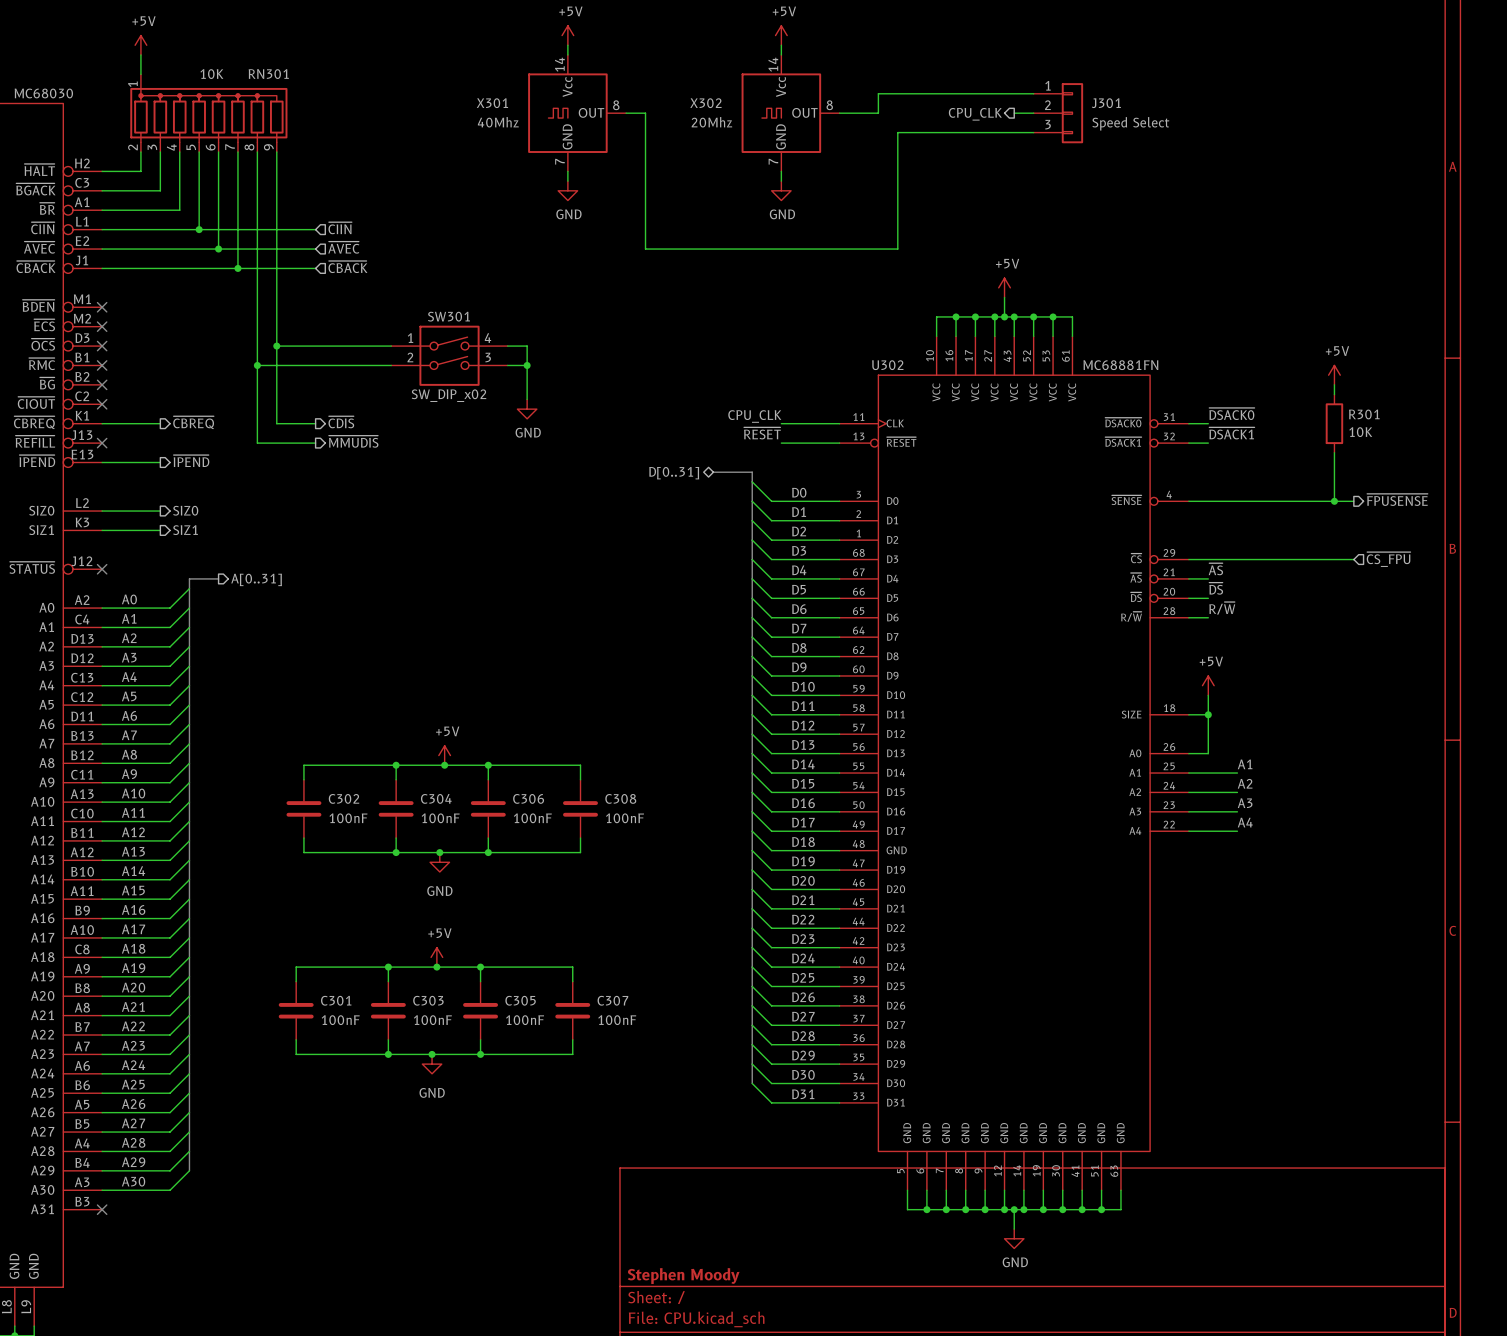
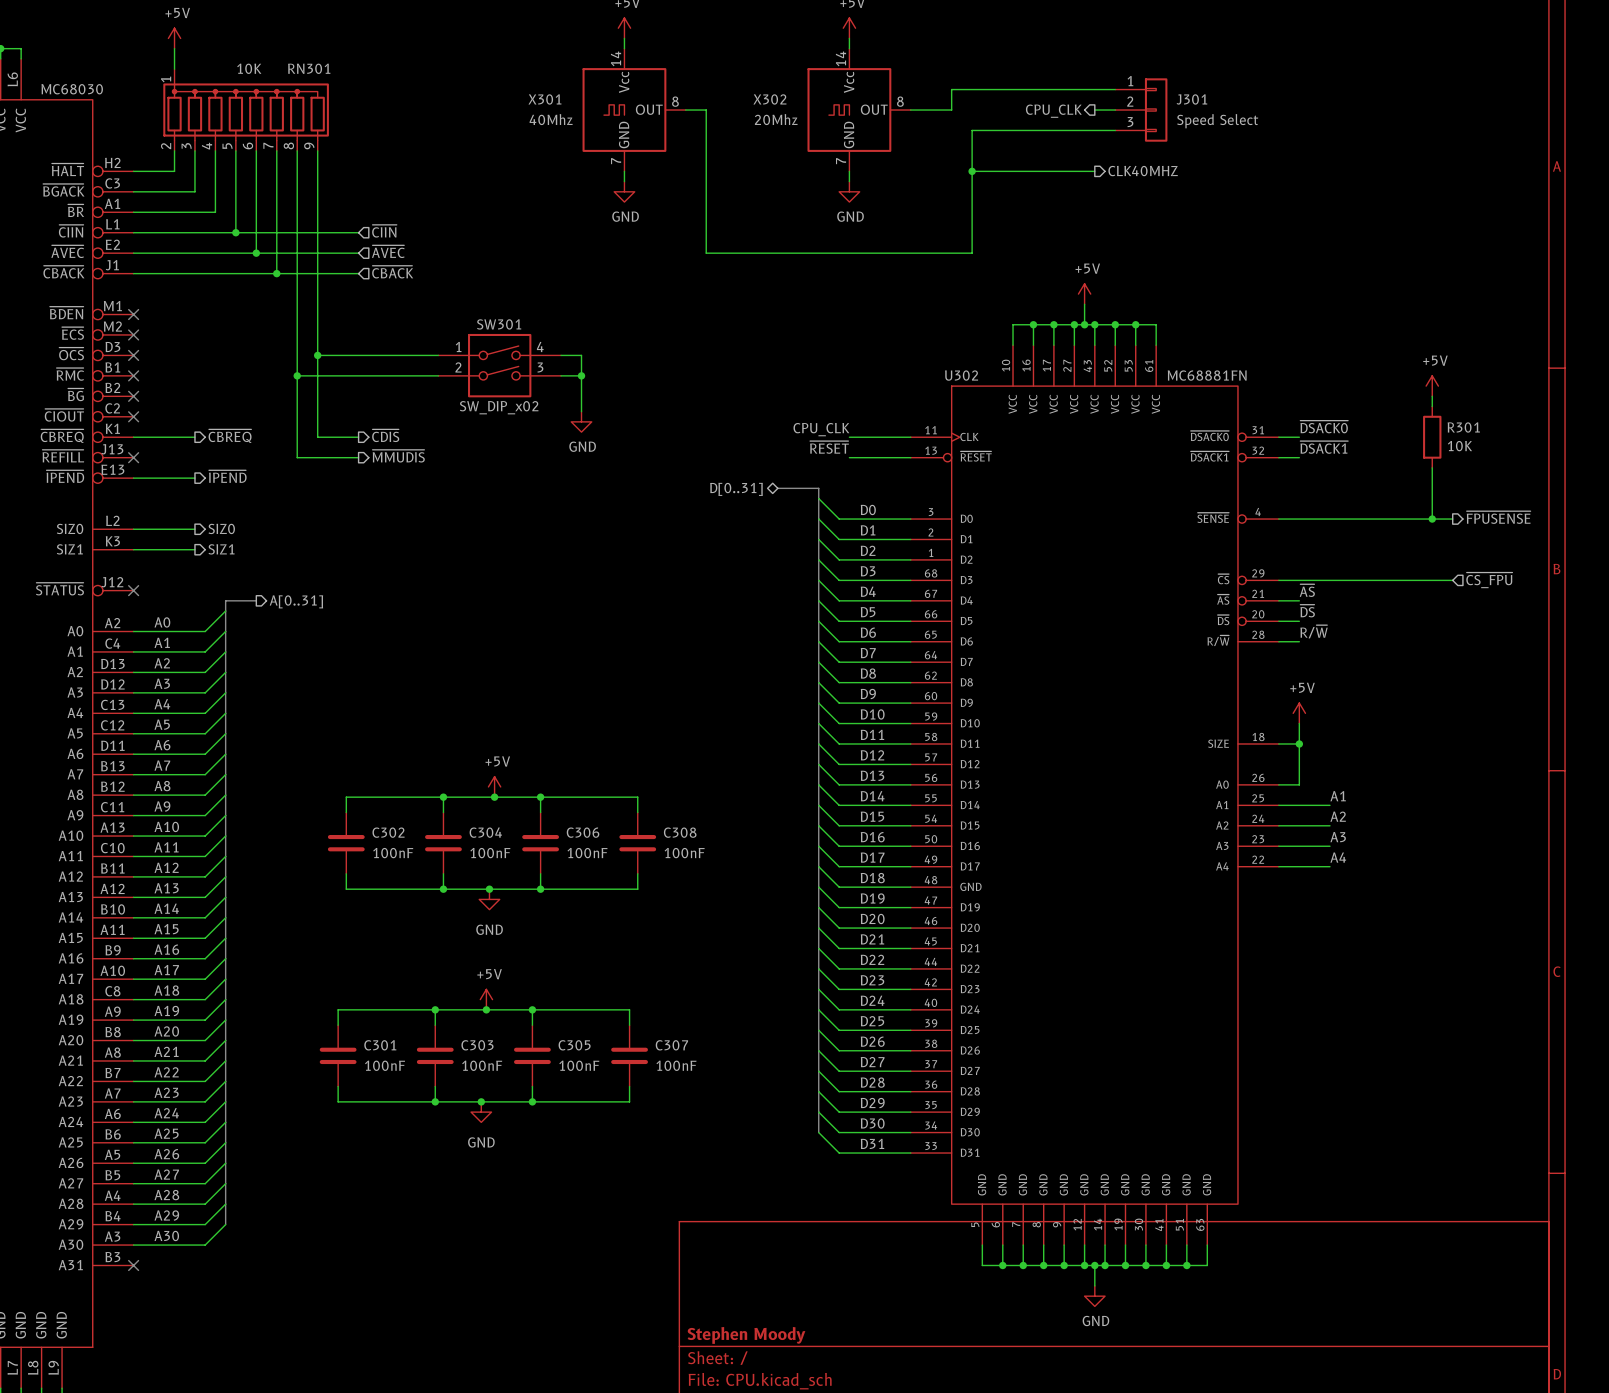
wire: none -> (972, 171) (1094, 171)
junction: none -> (972, 171)
hierarchical label: none -> CLK40MHZ (1143, 171)

